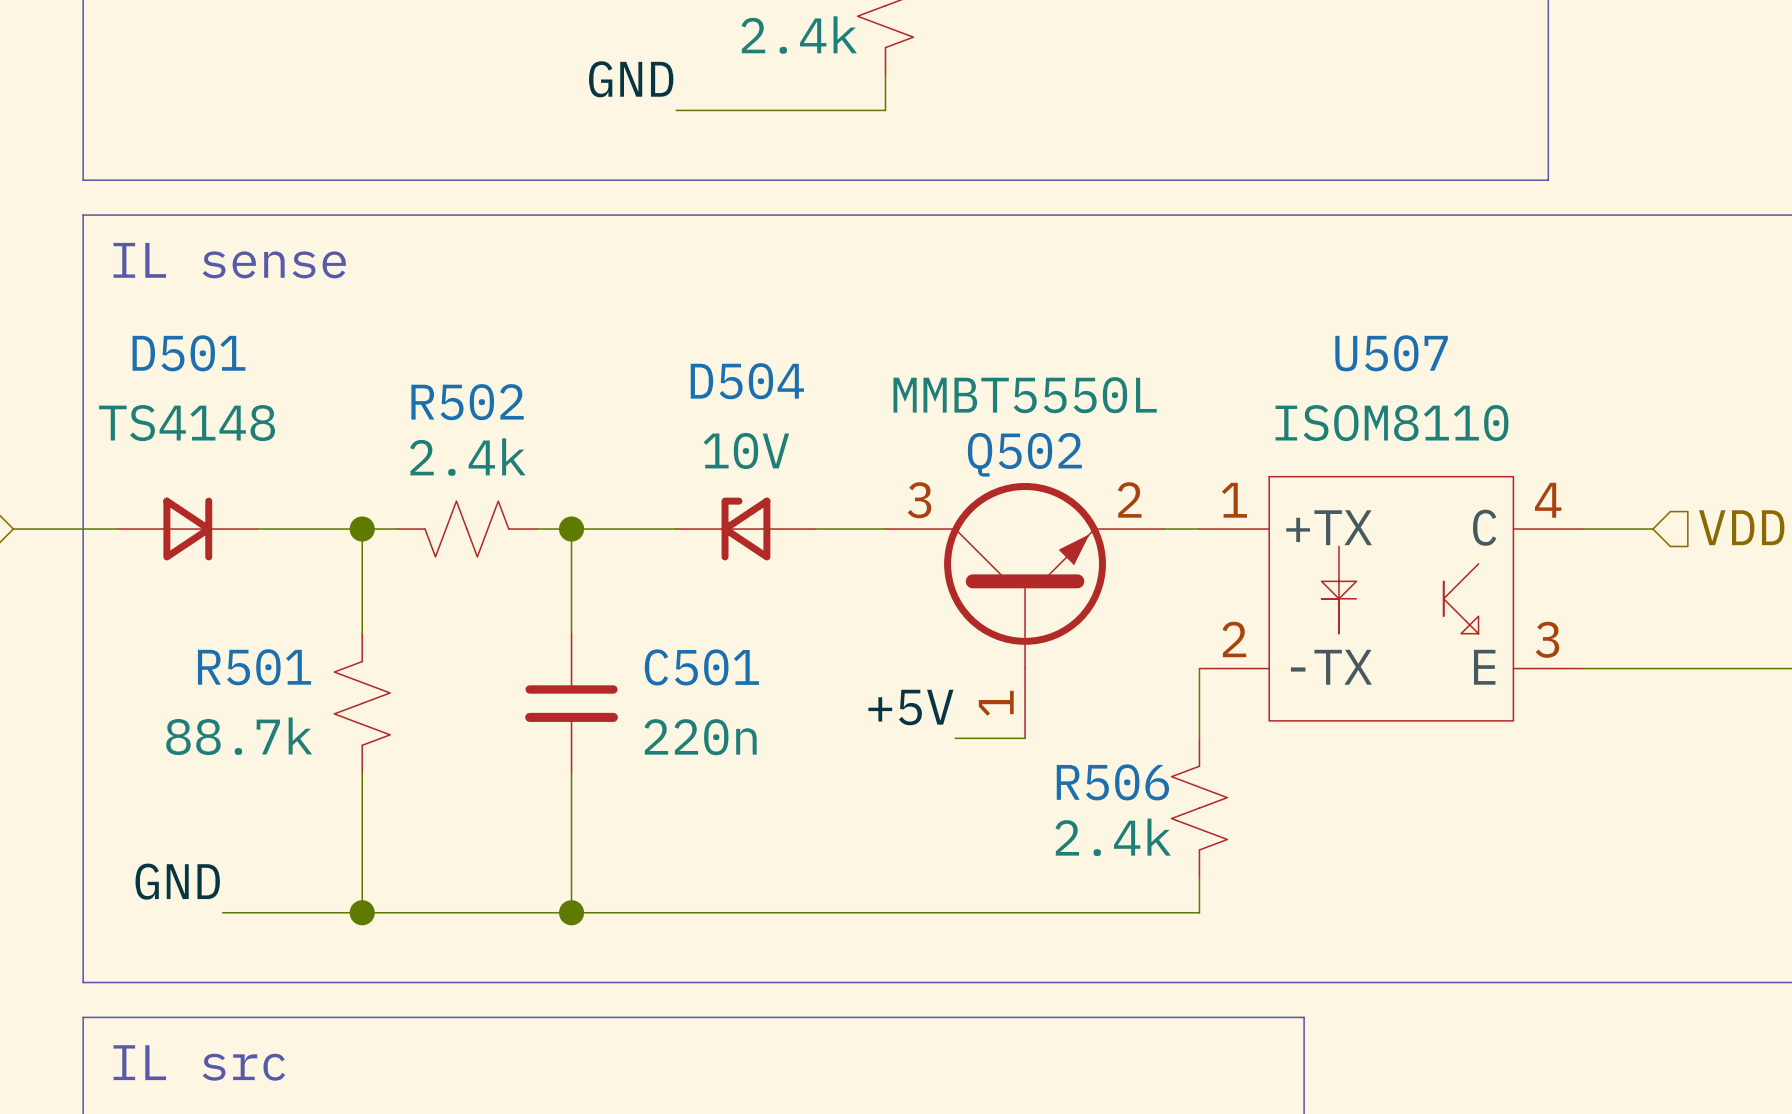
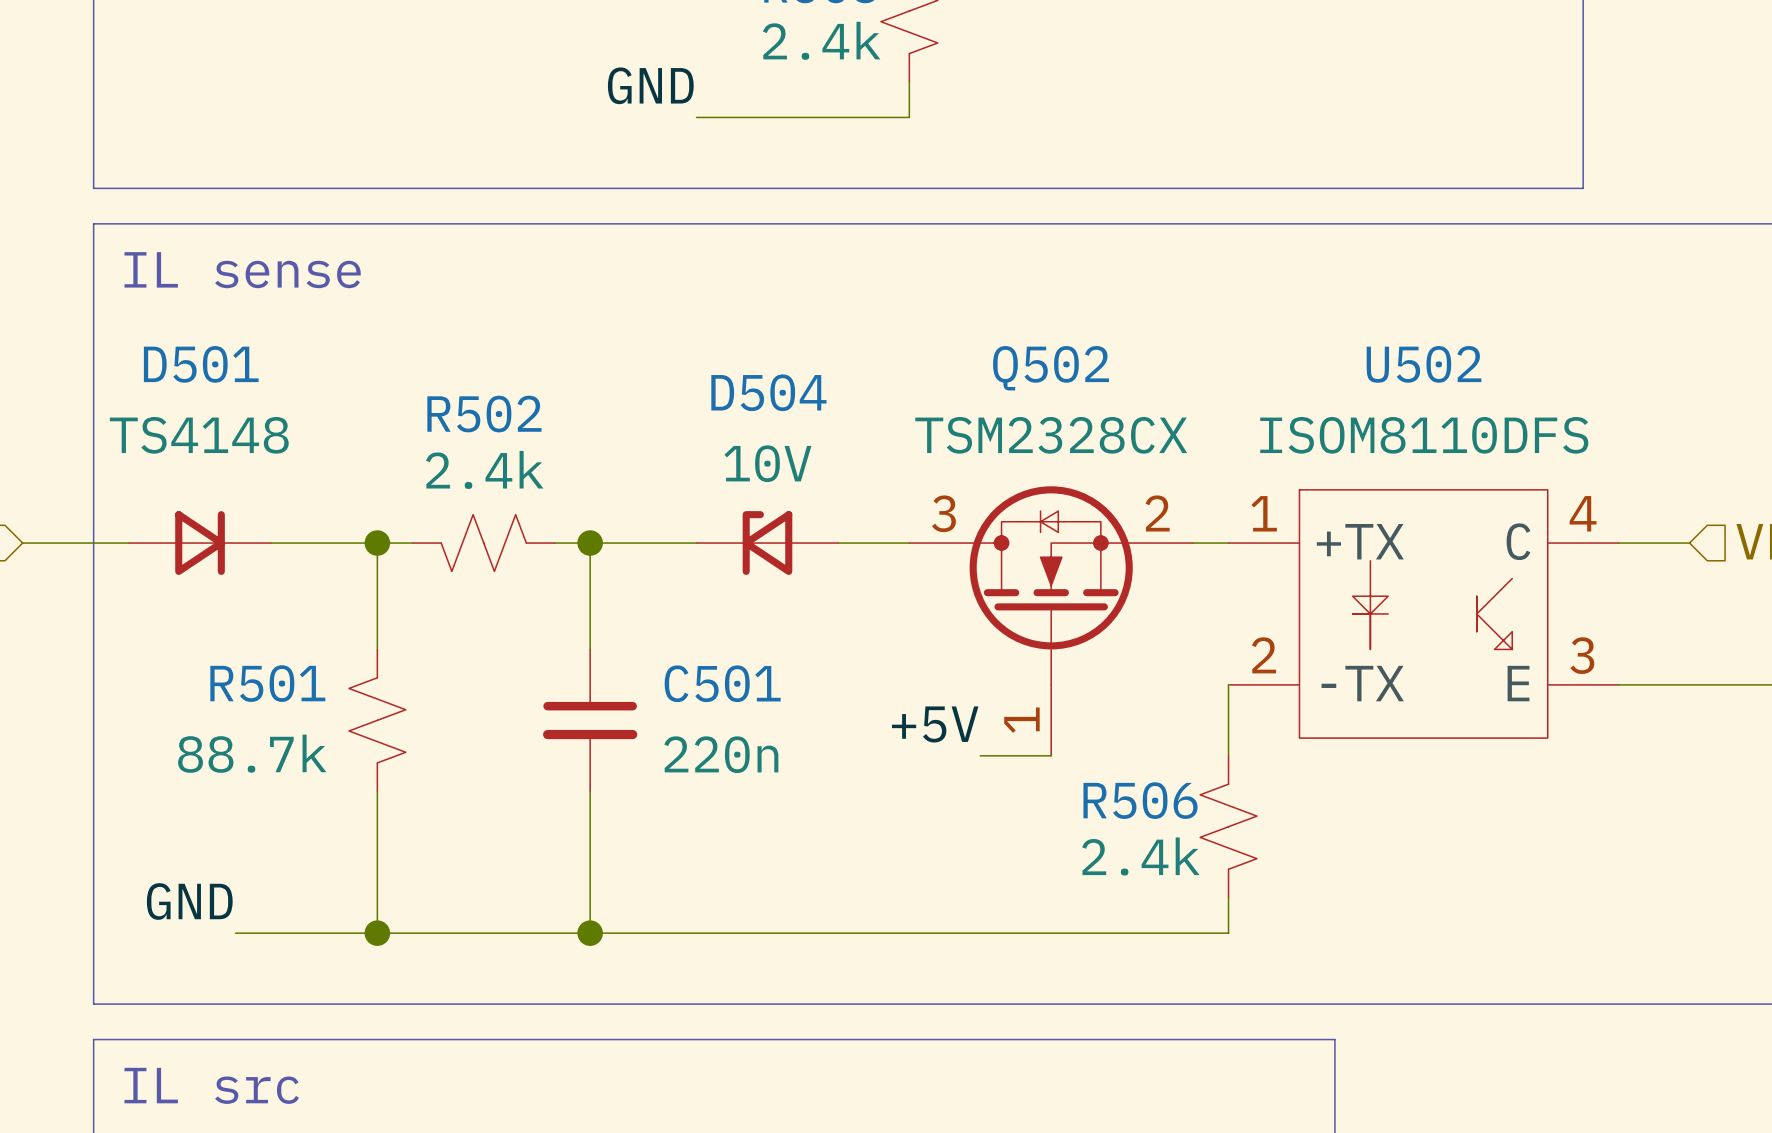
U507 name: U507 (1391, 353) -> U502 (1424, 364)
Q502 value: MMBT5550L (1025, 395) -> TSM2328CX (1051, 435)
U507 value: ISOM8110 (1392, 423) -> ISOM8110DFS (1424, 435)
Q502 name position: Q502 (1024, 454) -> Q502 (1051, 368)
Q502 symbol: [885, 482, 1165, 739] -> [909, 486, 1194, 756]

